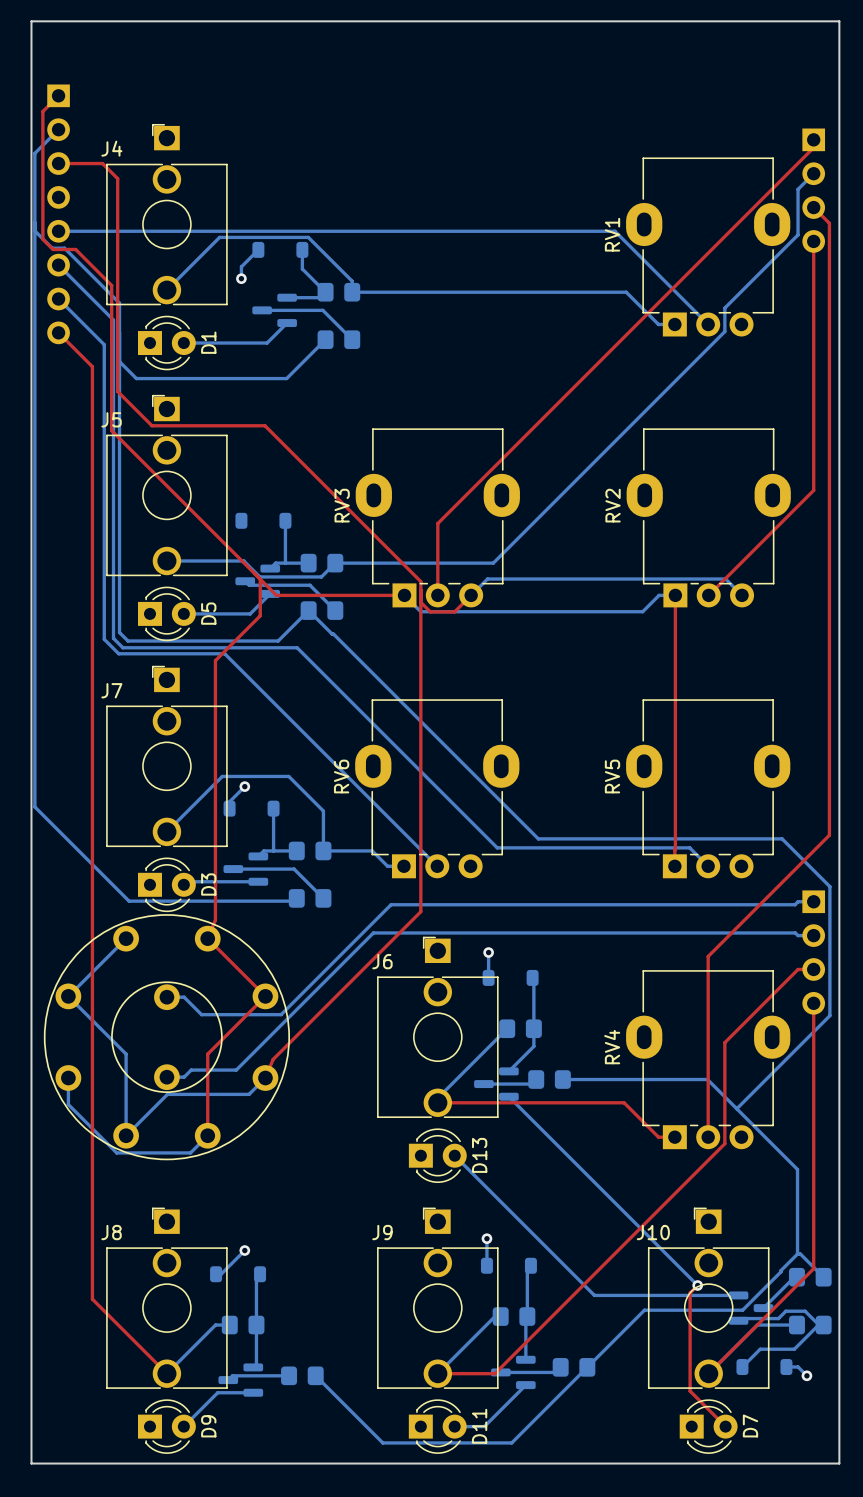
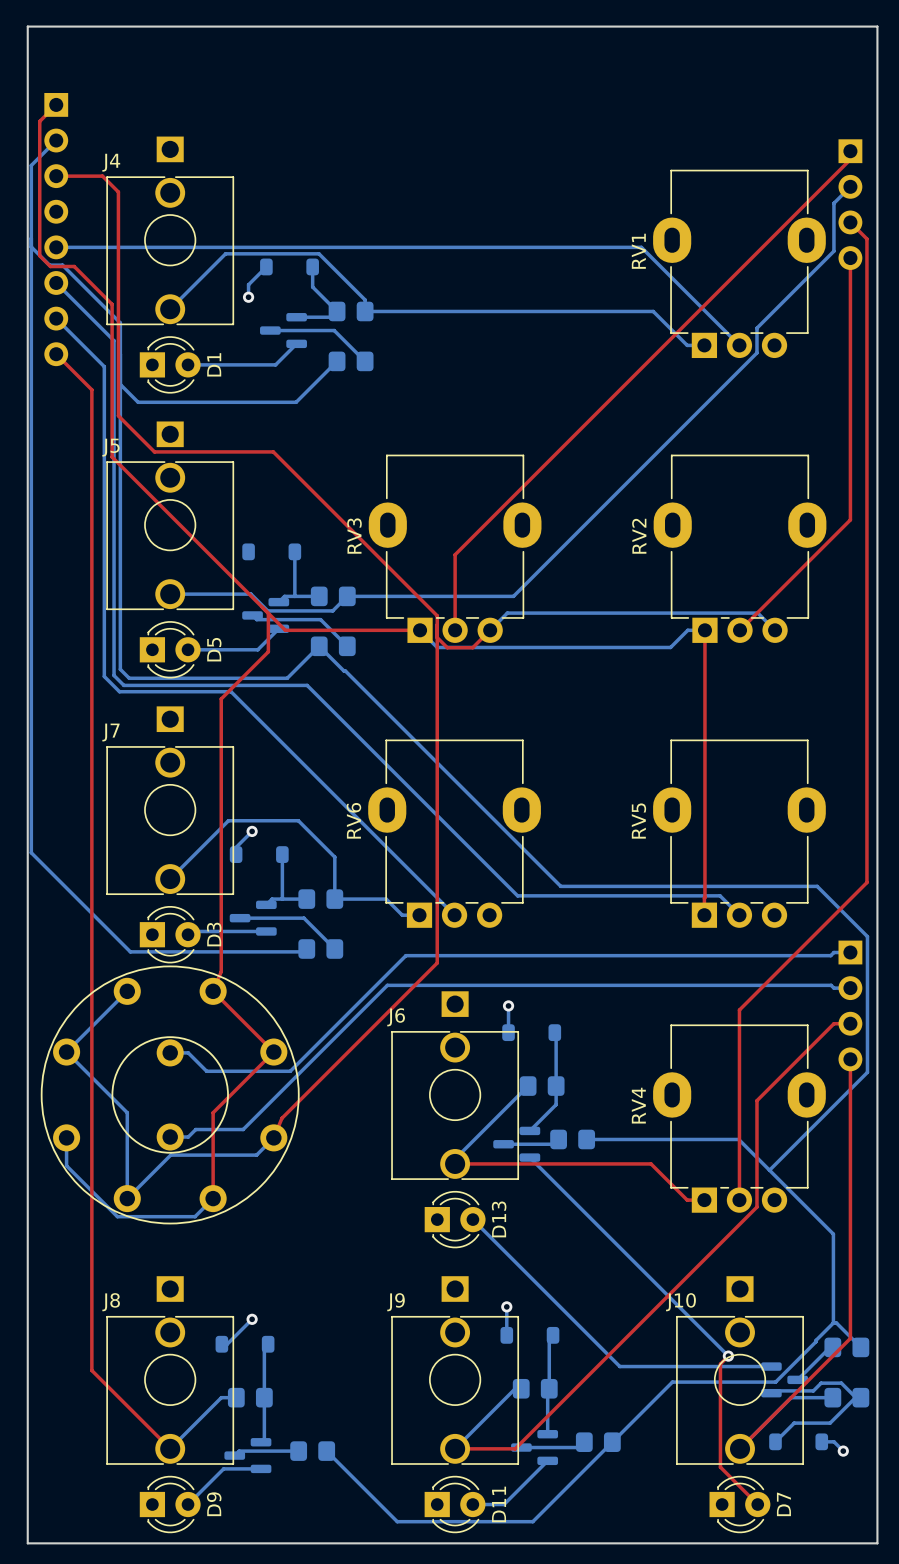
J4 footprint: [106, 123, 228, 306] -> [106, 136, 235, 326]
J5 footprint: [106, 394, 228, 577] -> [106, 421, 235, 611]
J7 footprint: [106, 665, 228, 848] -> [106, 706, 235, 896]
J6 footprint: [377, 936, 499, 1118] -> [391, 991, 520, 1180]
J8 footprint: [106, 1207, 228, 1389] -> [106, 1276, 235, 1465]
J9 footprint: [377, 1207, 499, 1389] -> [391, 1276, 520, 1465]
J10 footprint: [647, 1207, 770, 1389] -> [676, 1276, 804, 1465]

